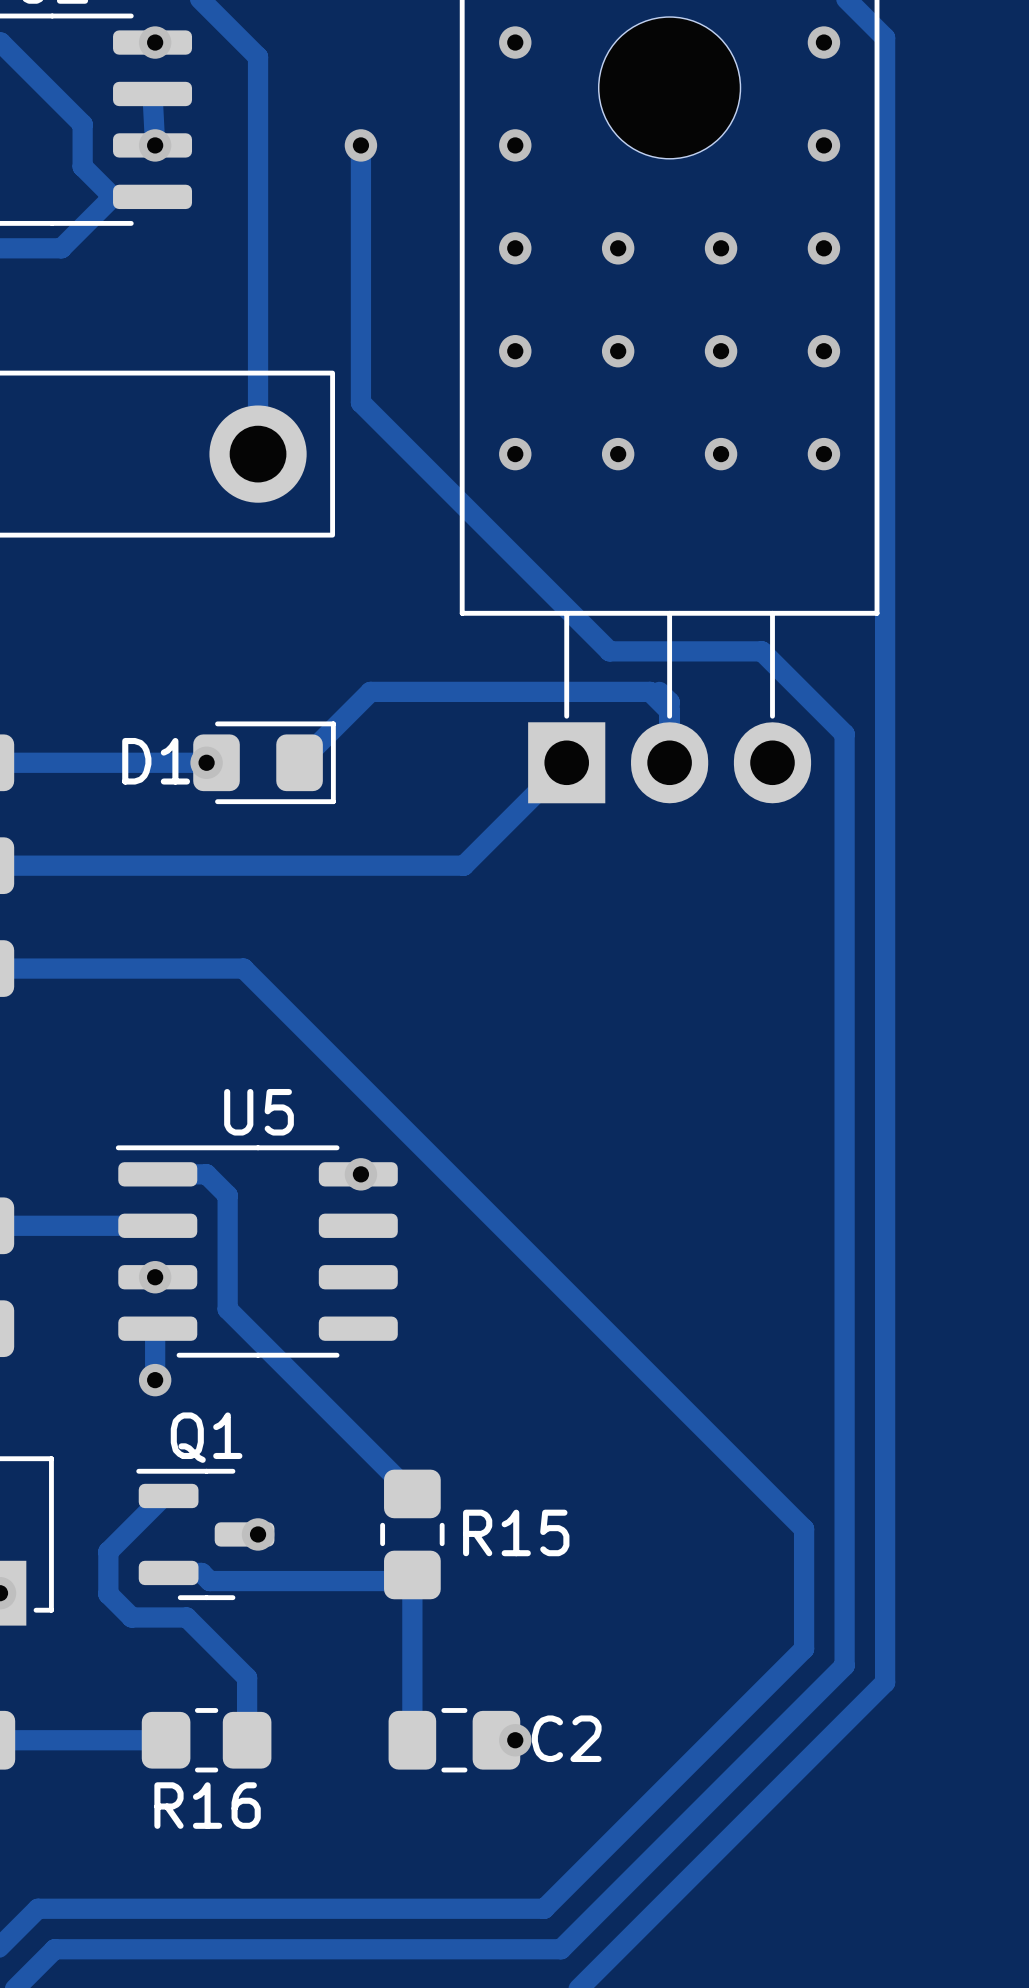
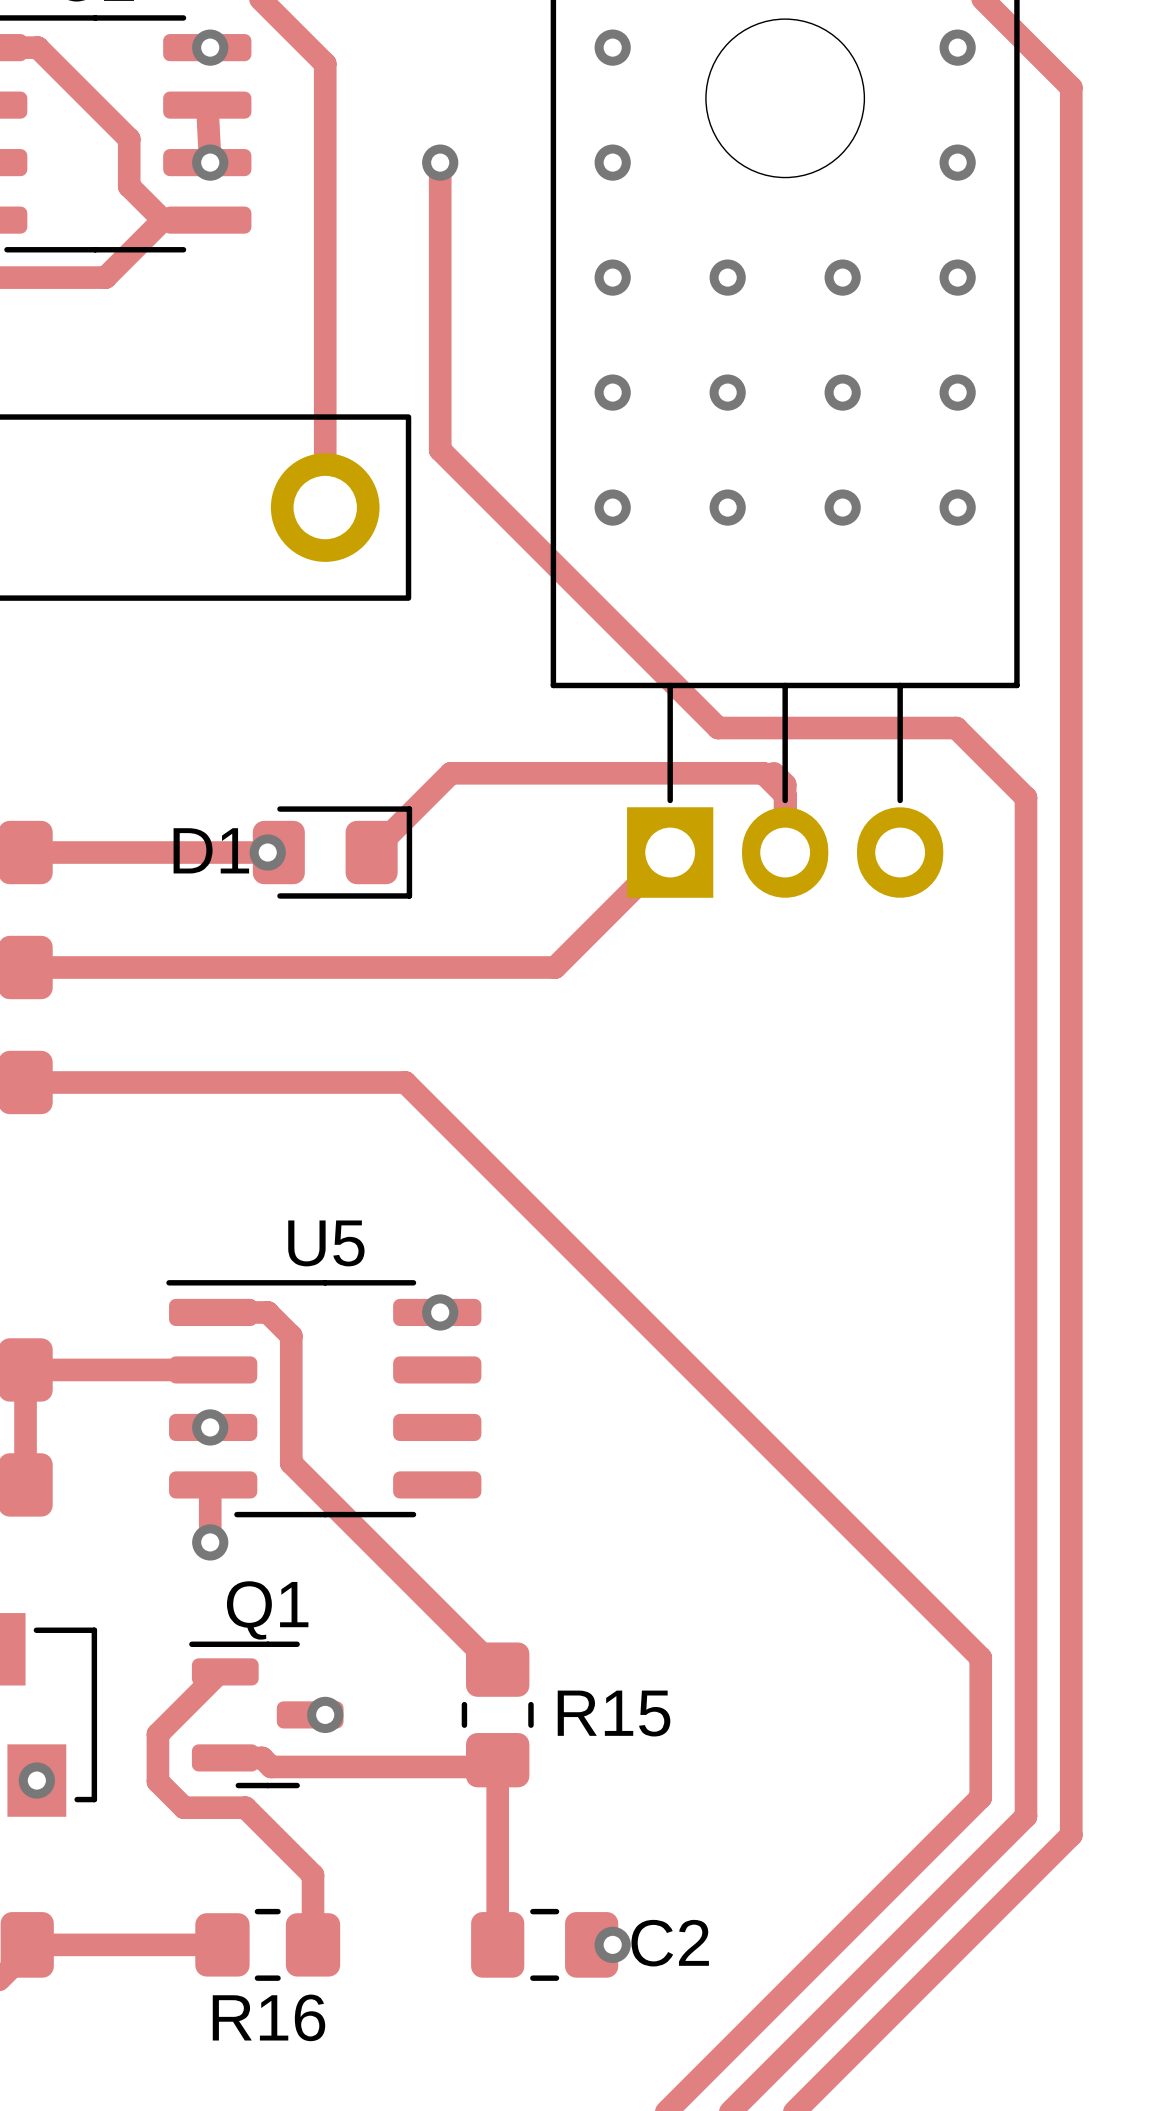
track: (885, 37) (885, 713) -> (888, 728) (956, 728) (1026, 797)
track: none -> (1026, 42) (1071, 87) (1071, 1835) (1026, 1880)
track: (761, 651) (844, 734) (844, 1483) -> none
track: (243, 968) (804, 1529) (804, 1648) -> (309, 1082) (405, 1082) (980, 1657)
track: (844, 1608) (844, 1665) -> (980, 1797) (935, 1842)
track: (885, 1625) (885, 1682) -> (1026, 1816) (980, 1861)

